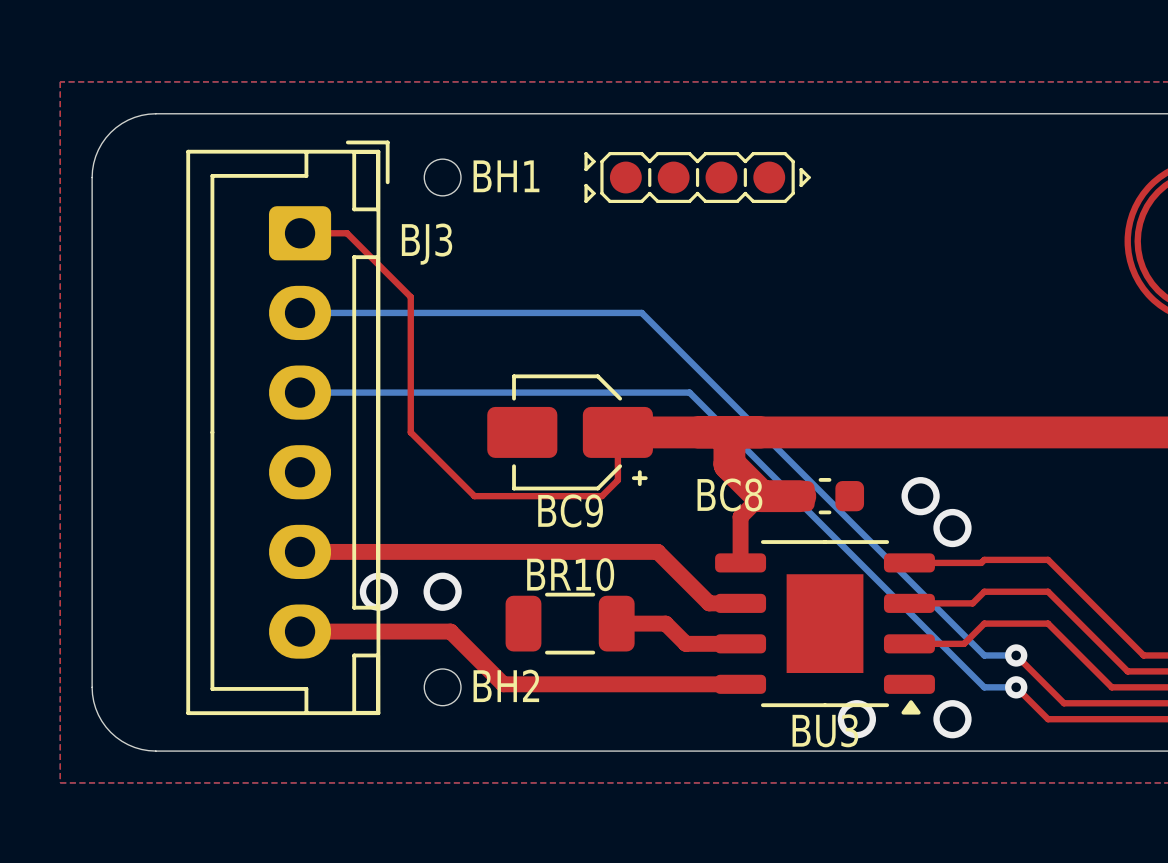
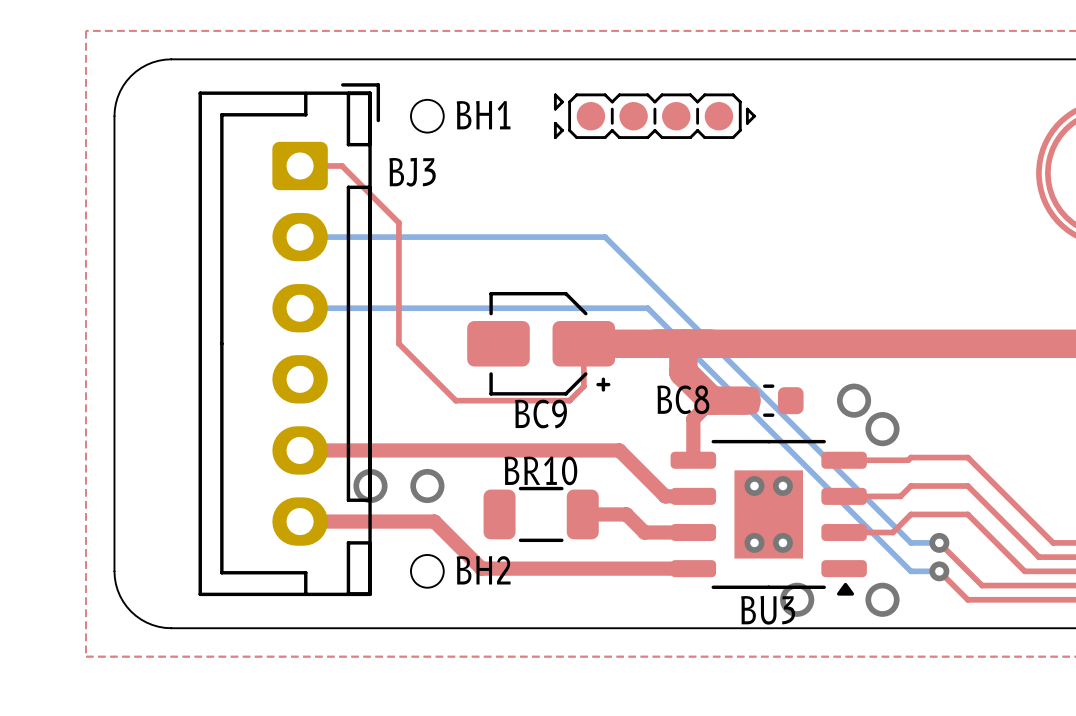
via: none -> (754, 486)
via: none -> (782, 486)
via: none -> (754, 542)
via: none -> (782, 542)

